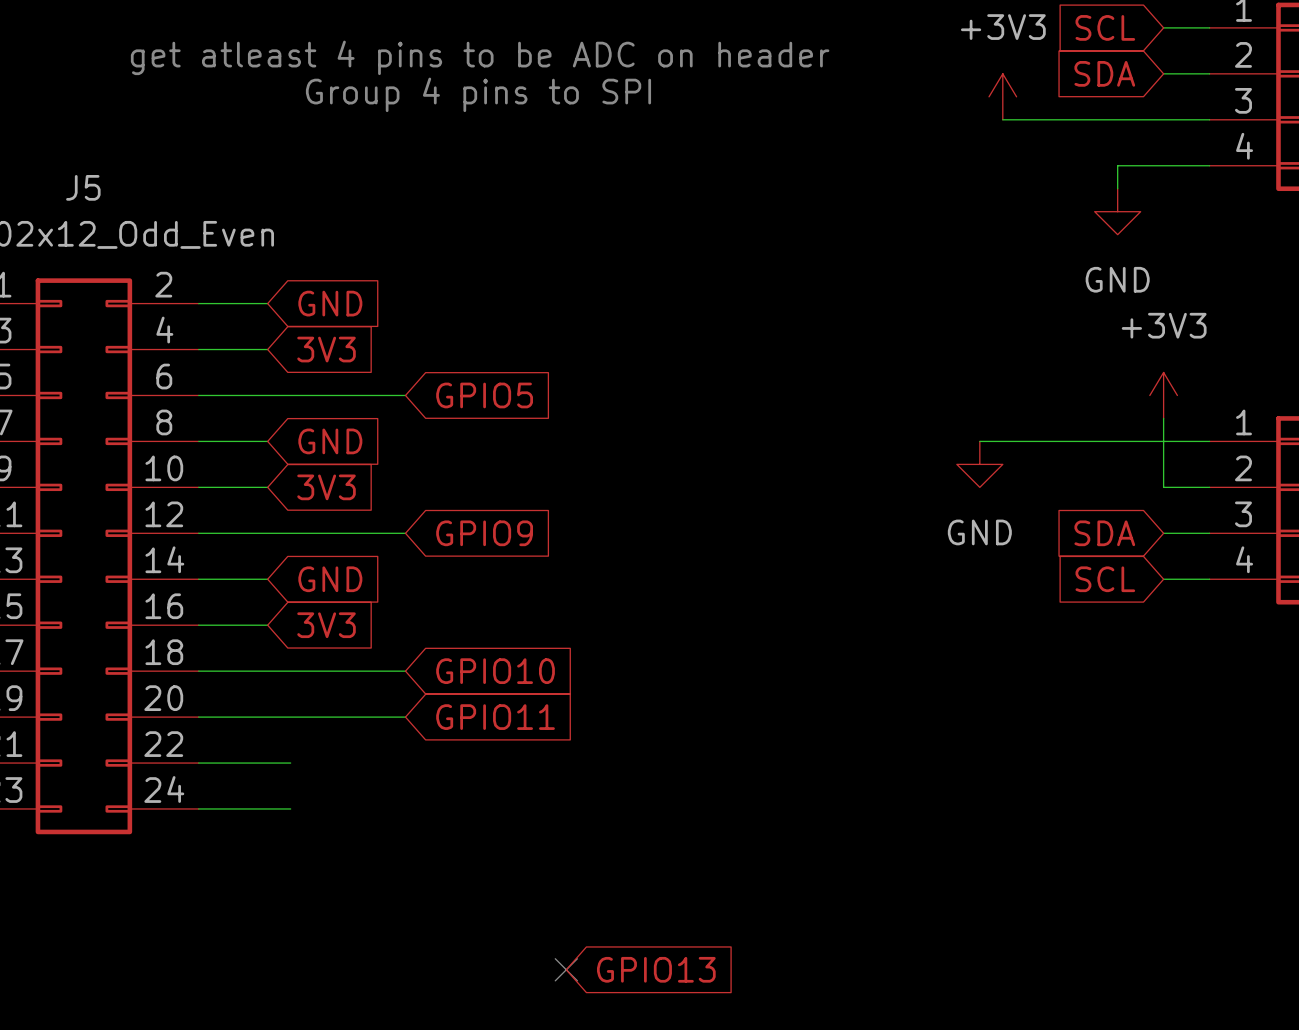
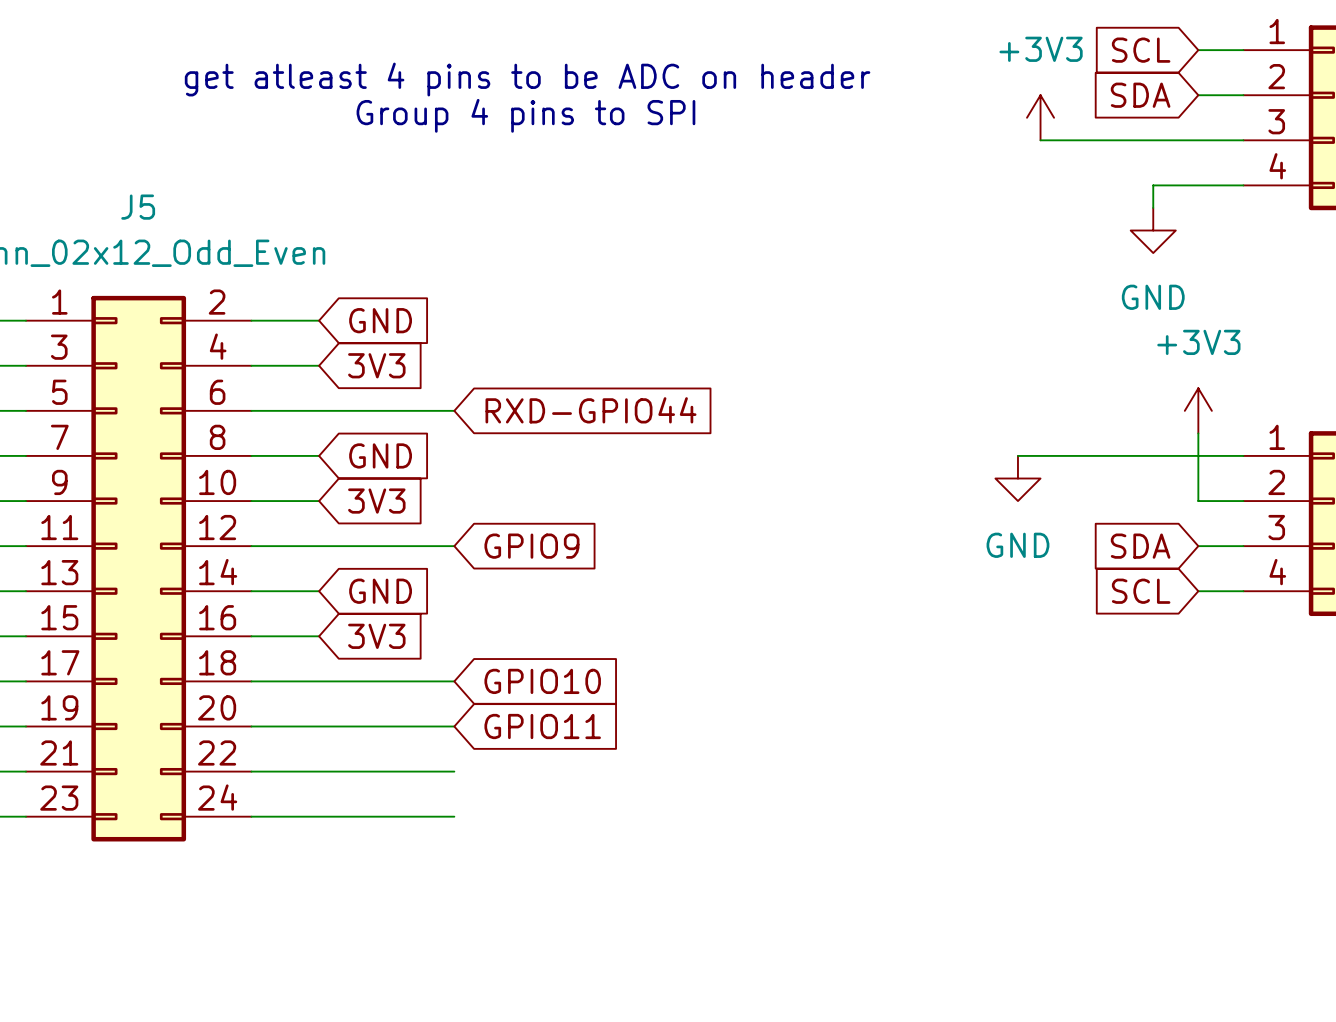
global label: GPIO5 (484, 395) -> RXD-GPIO44 (590, 410)
wire: none -> (341, 771) (454, 771)
wire: none -> (341, 816) (454, 816)
no-connect mark: (566, 969) -> none
global label: GPIO13 (656, 969) -> none

